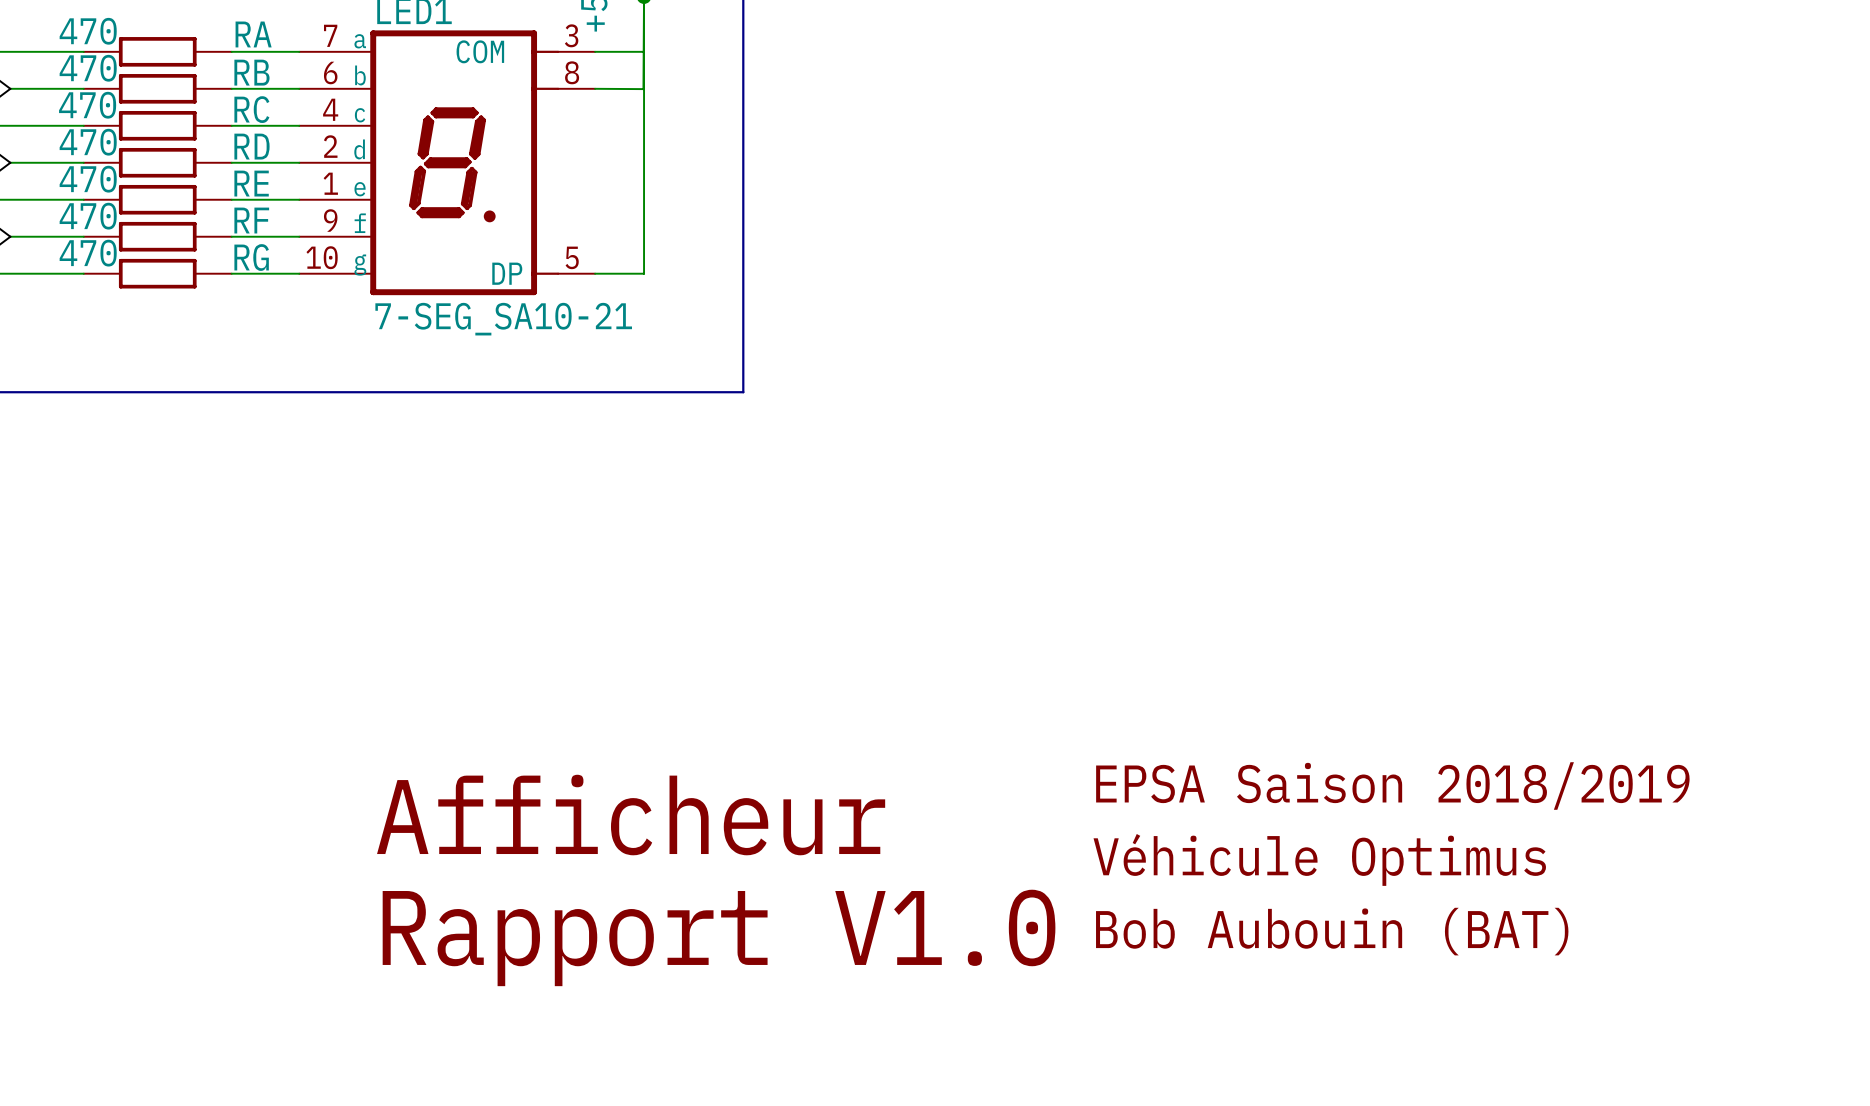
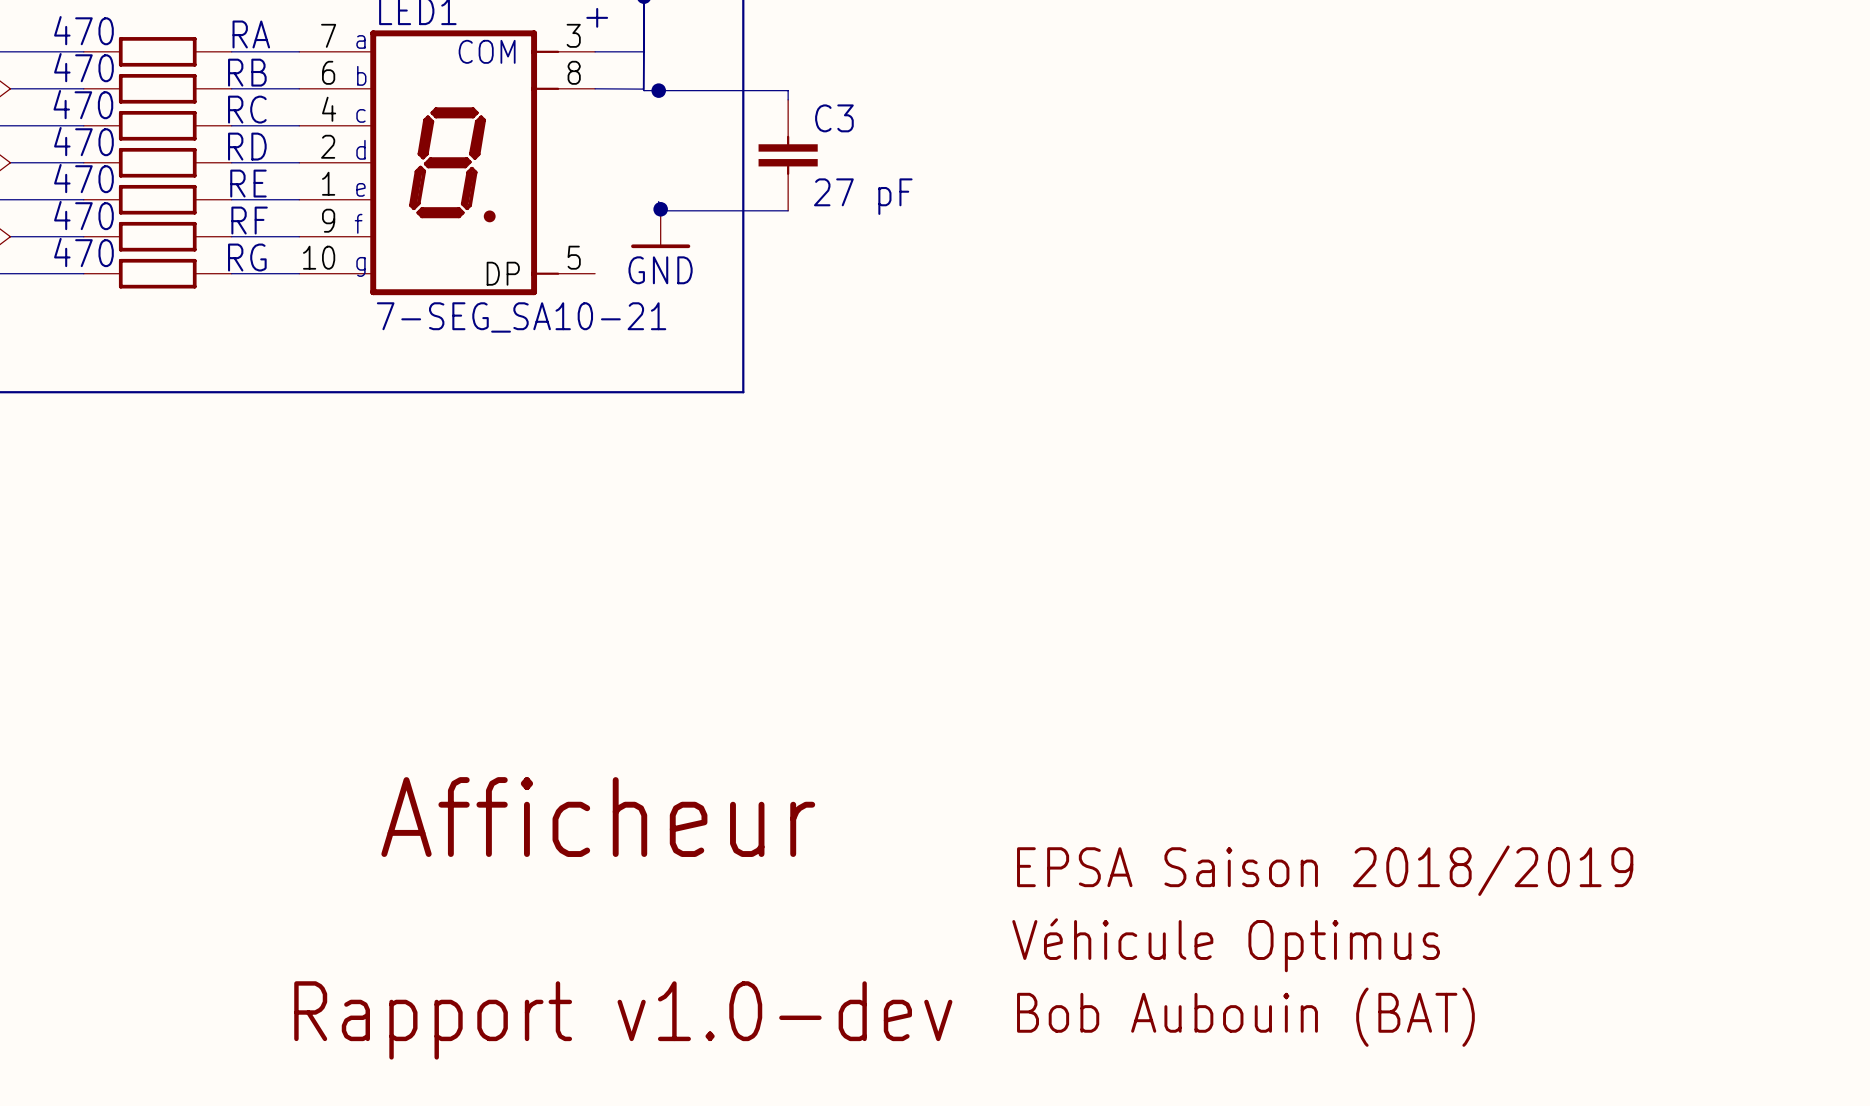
wire: (644, 90) (644, 273) (595, 273) -> (644, 90) (788, 90) (788, 99)
junction: none -> (658, 90)
C3: none -> 27 pF (788, 155)
wire: none -> (658, 201) (658, 209) (660, 210) (788, 210)
junction: none -> (660, 209)
power symbol: none -> GND (660, 228)
text position: EPSA Saison 2018/2019 (1392, 786) -> EPSA Saison 2018/2019 (1325, 870)
text position: Véhicule Optimus (1319, 859) -> Véhicule Optimus (1226, 945)
text position: Bob Aubouin (BAT) (1332, 931) -> Bob Aubouin (BAT) (1245, 1017)
text: Rapport V1.0 (719, 937) -> Rapport v1.0-dev (623, 1020)

